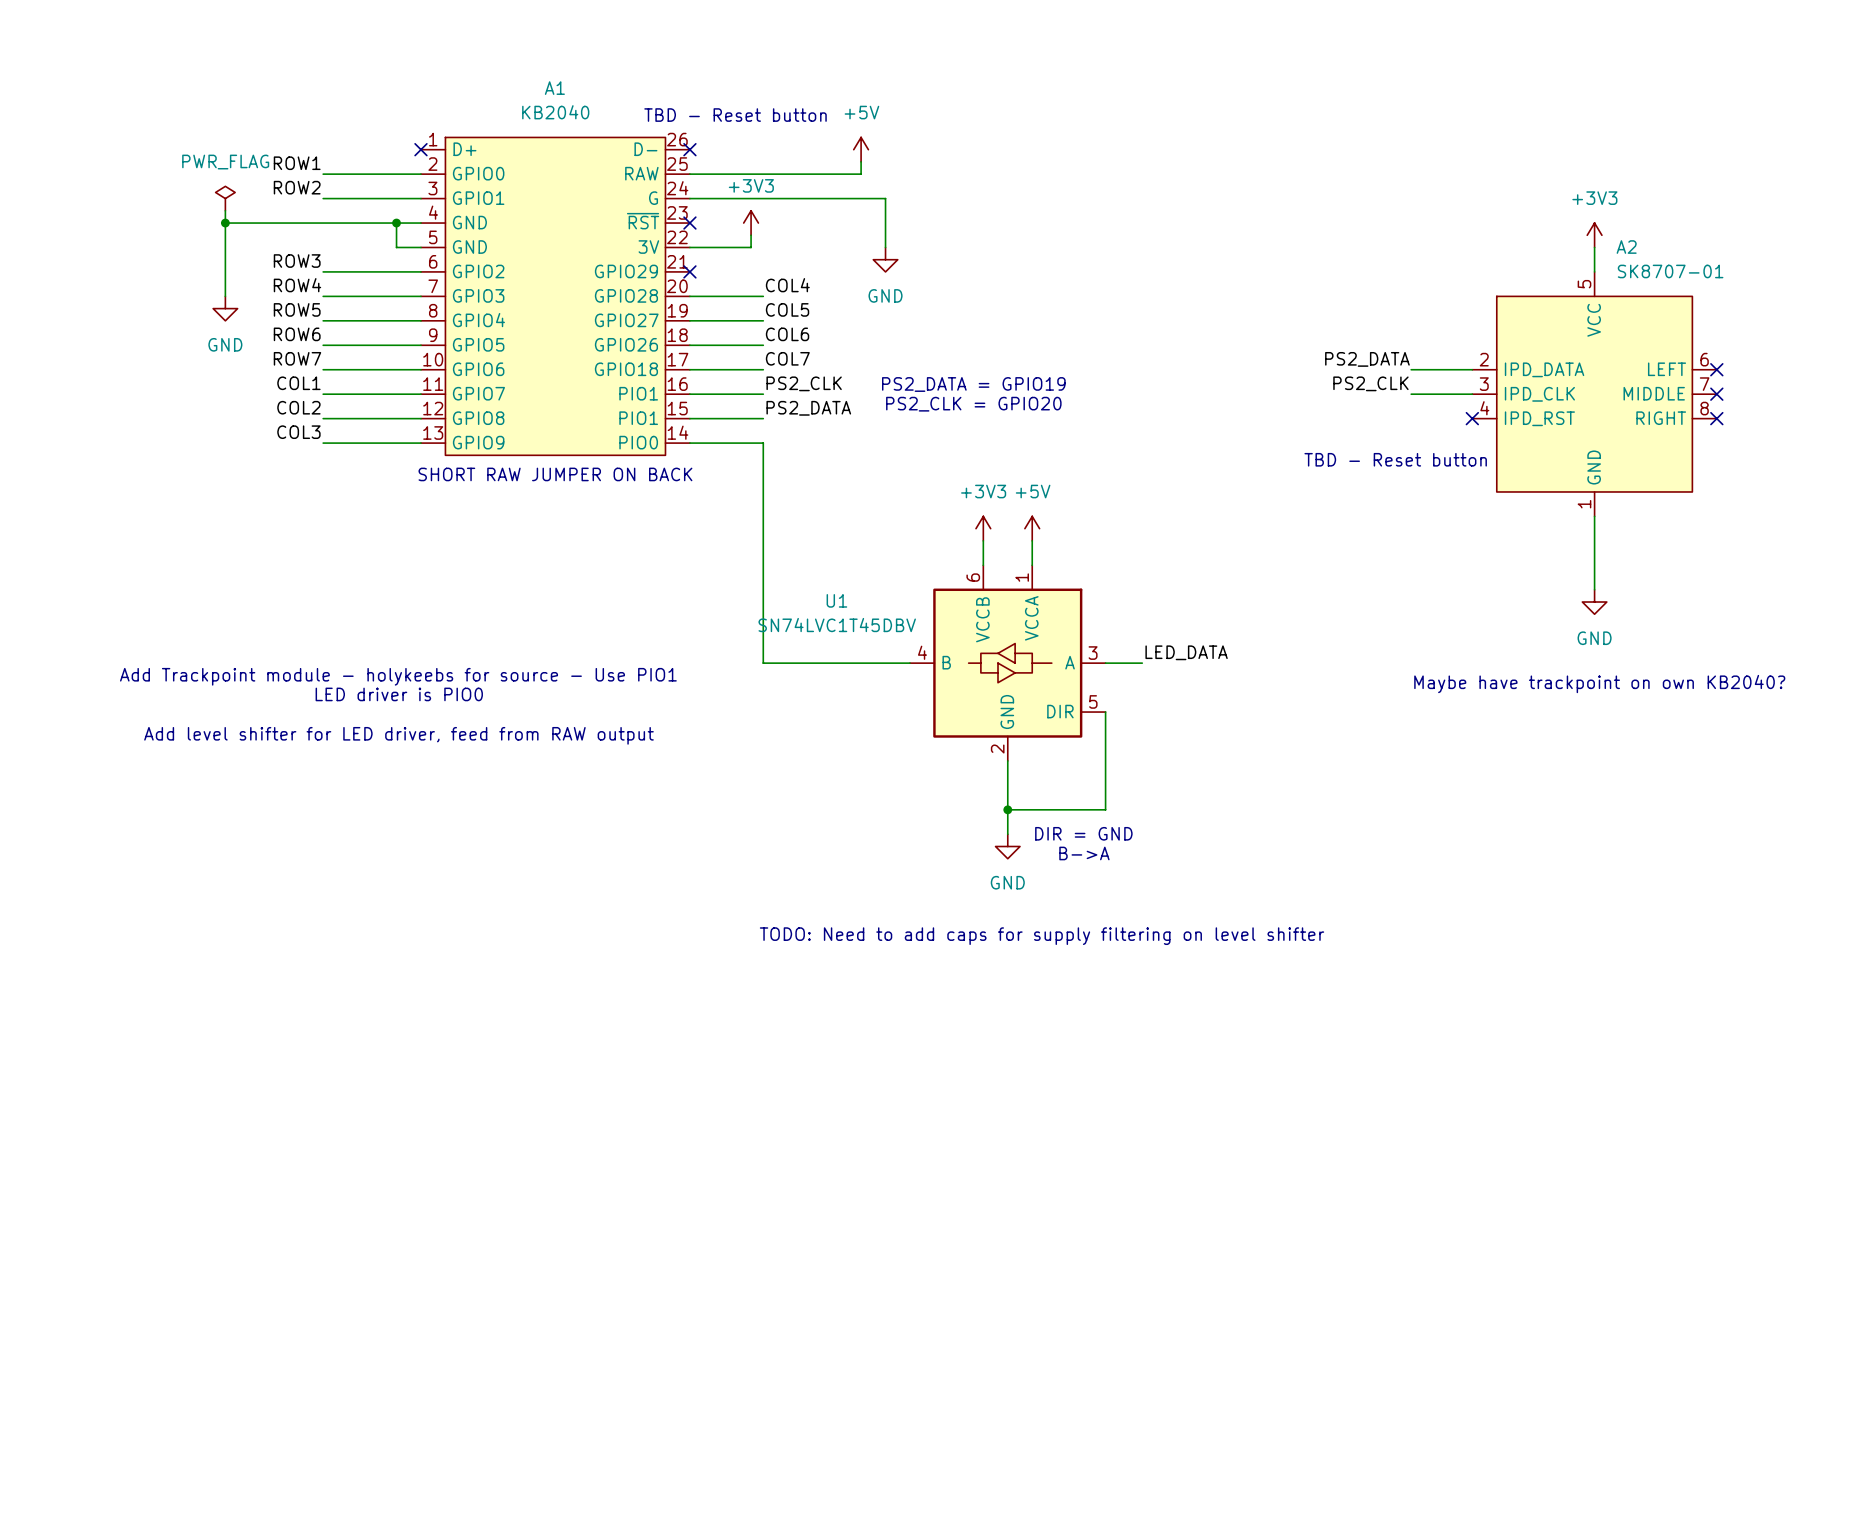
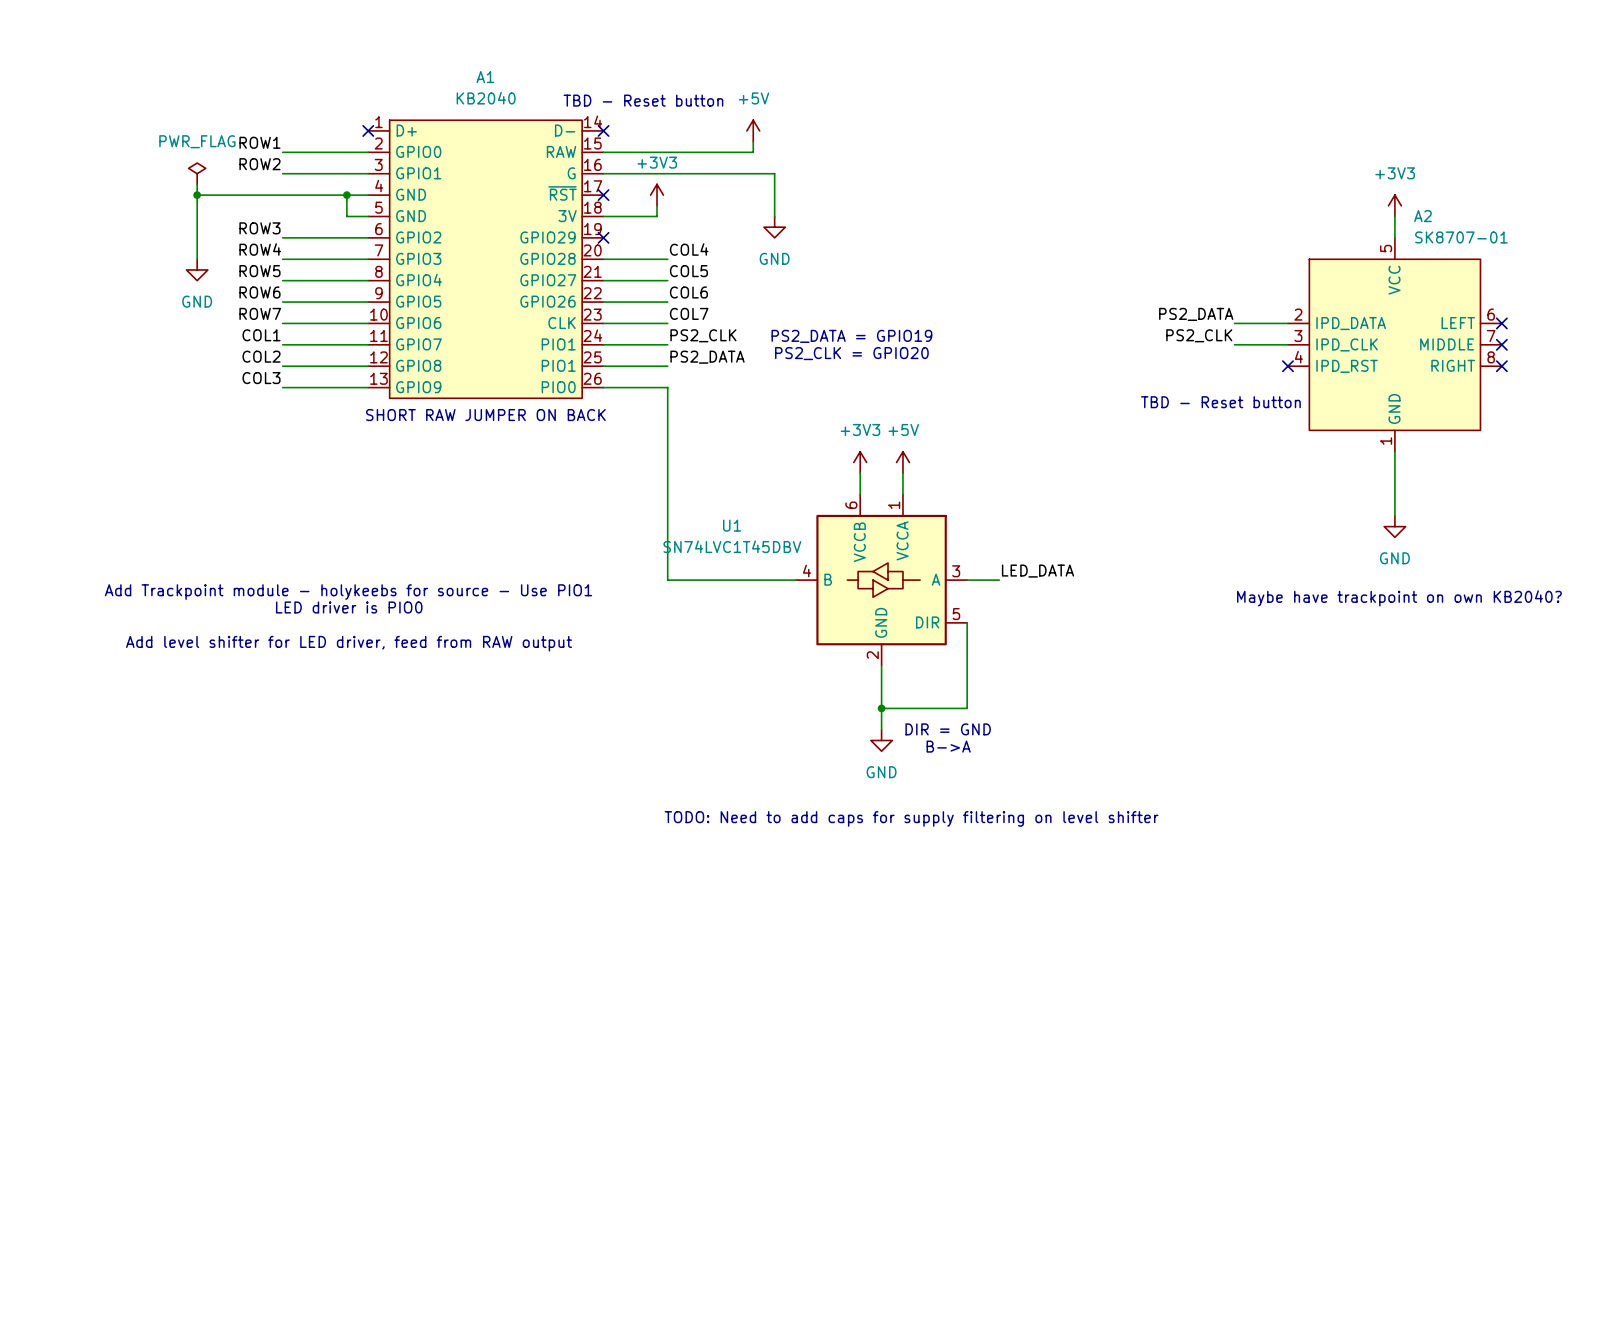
A1 symbol: [420, 137, 690, 456] -> [368, 120, 604, 399]

